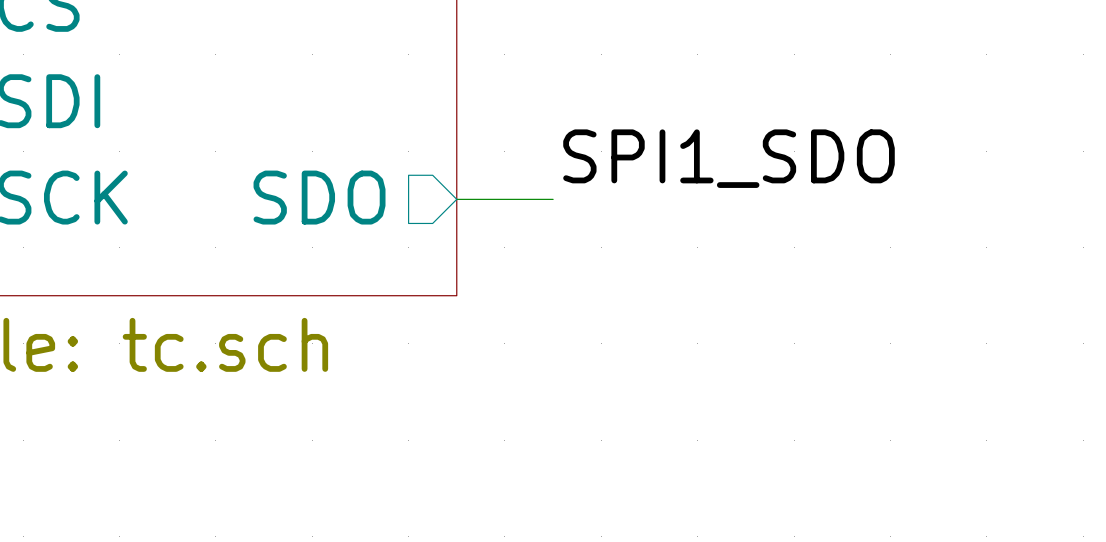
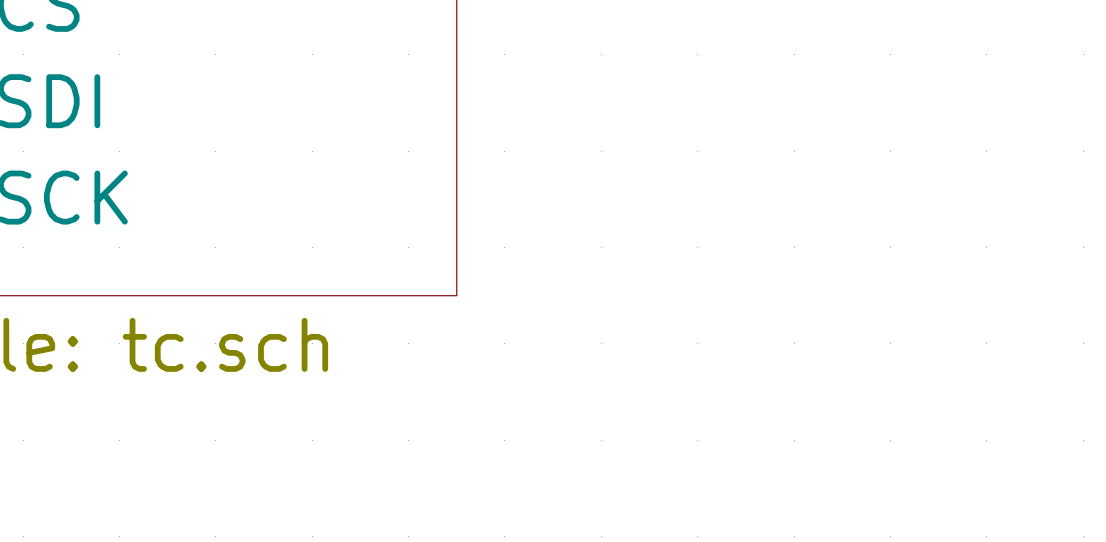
label: SPI1_SDO (729, 158) -> none
sheet pin: SDO (319, 197) -> none
wire: (456, 199) (553, 199) -> none

